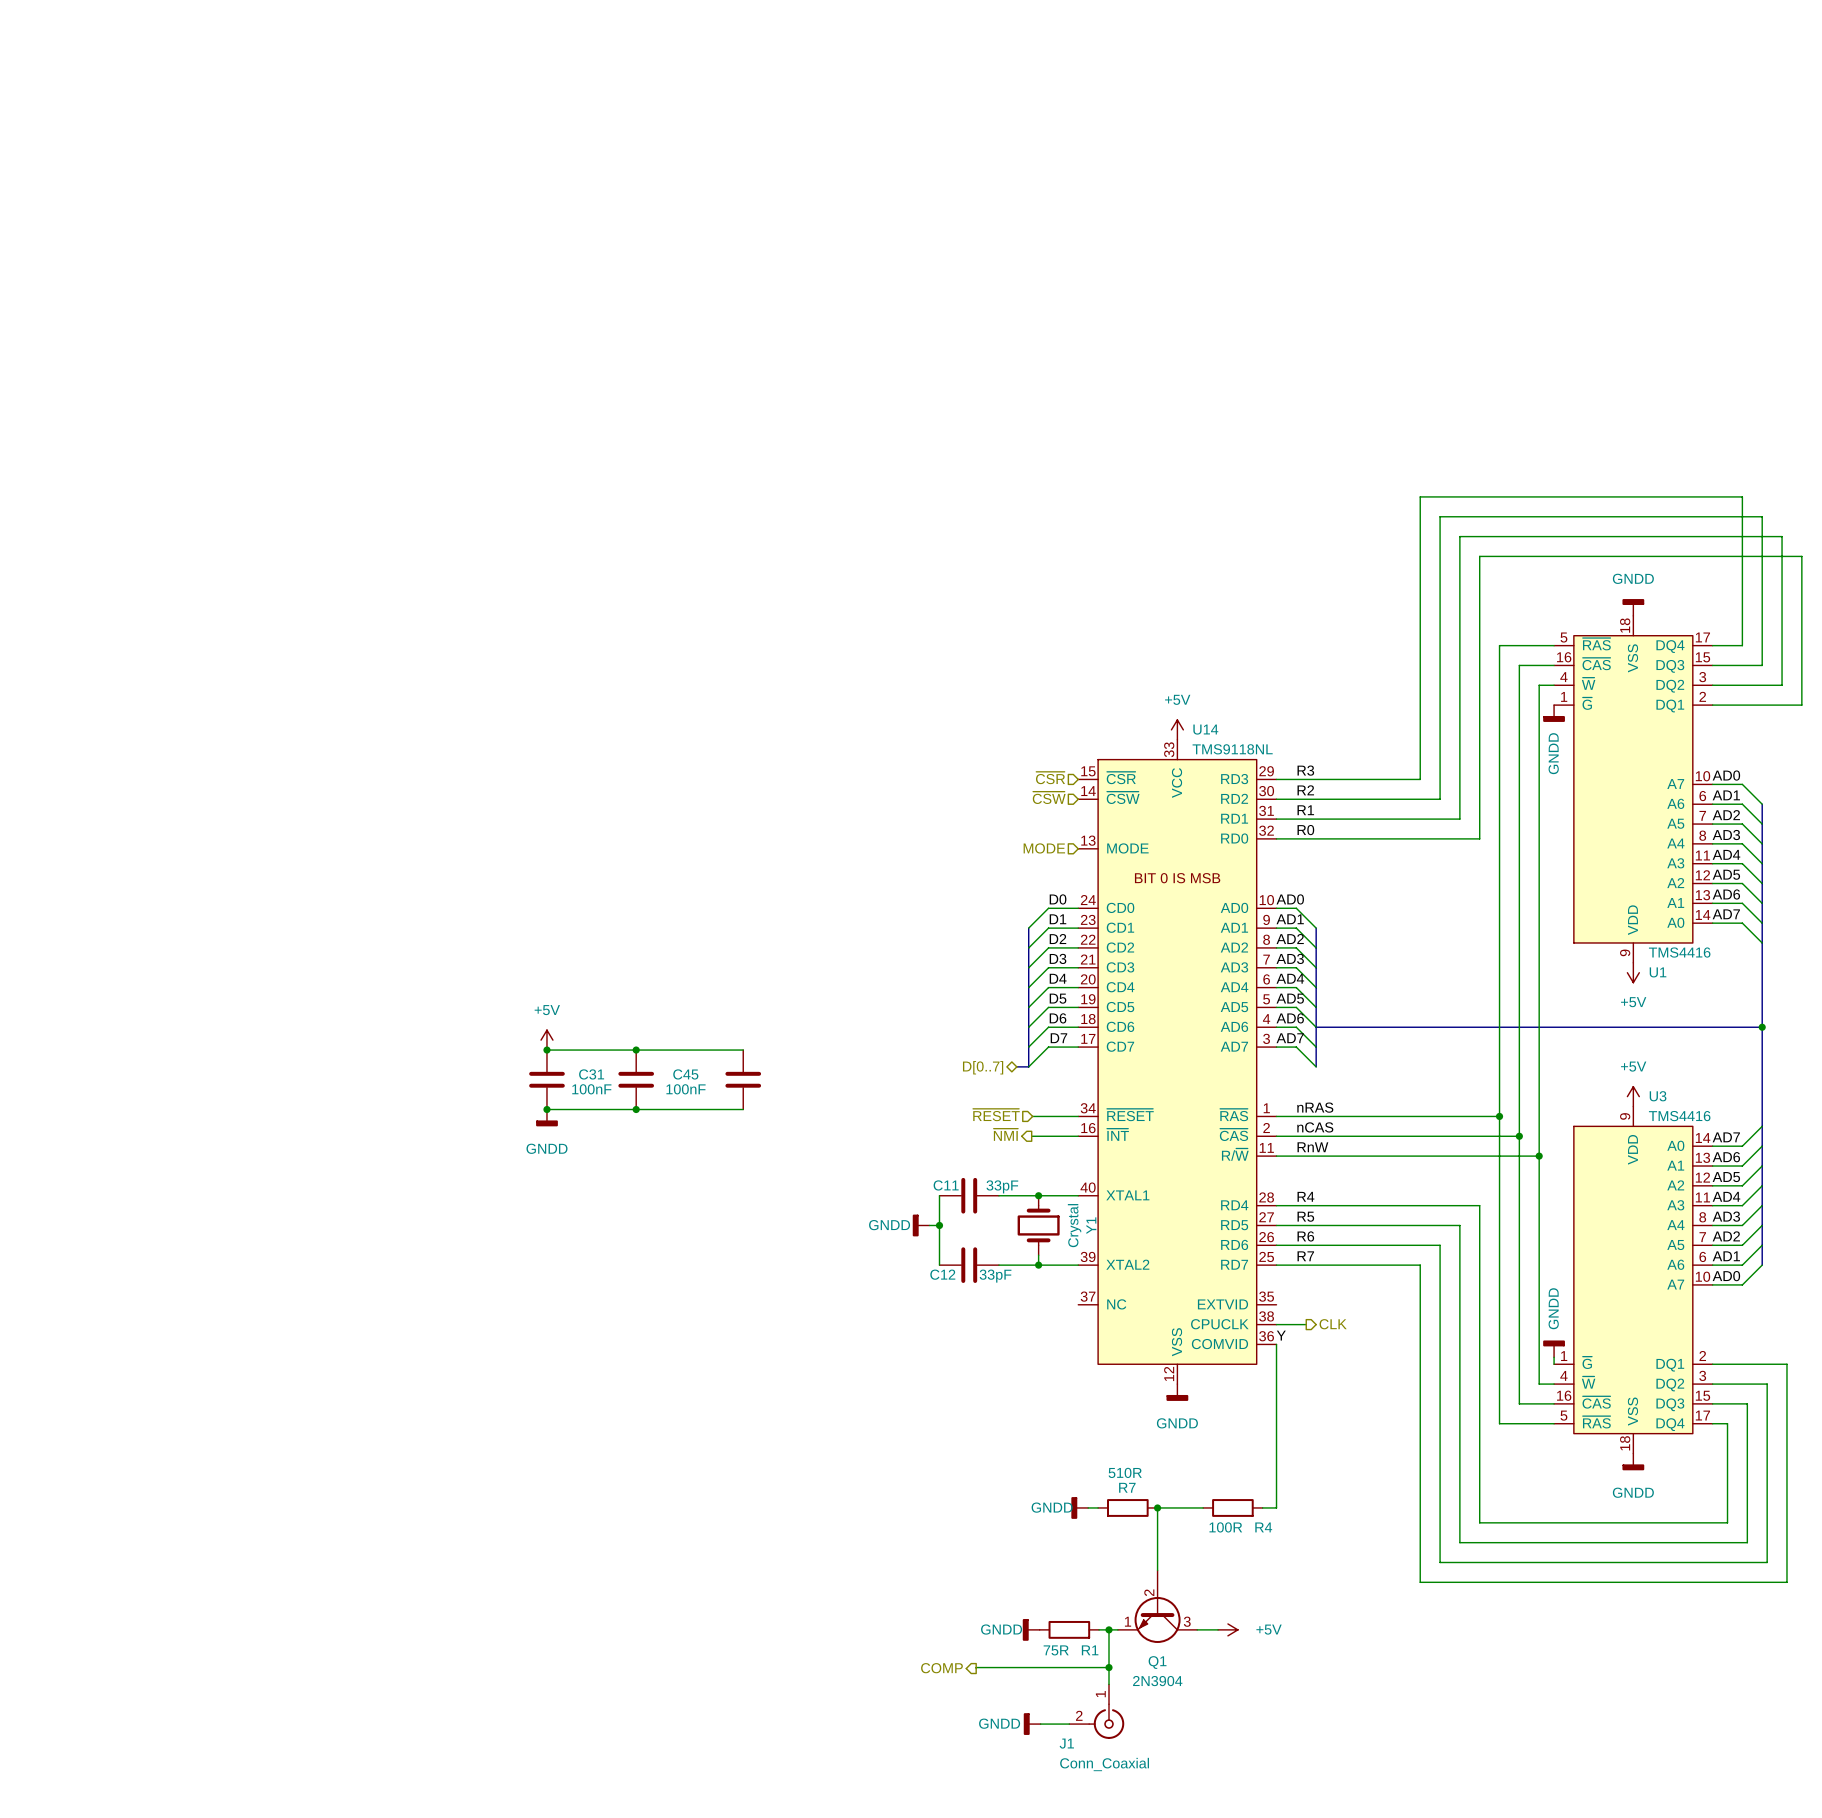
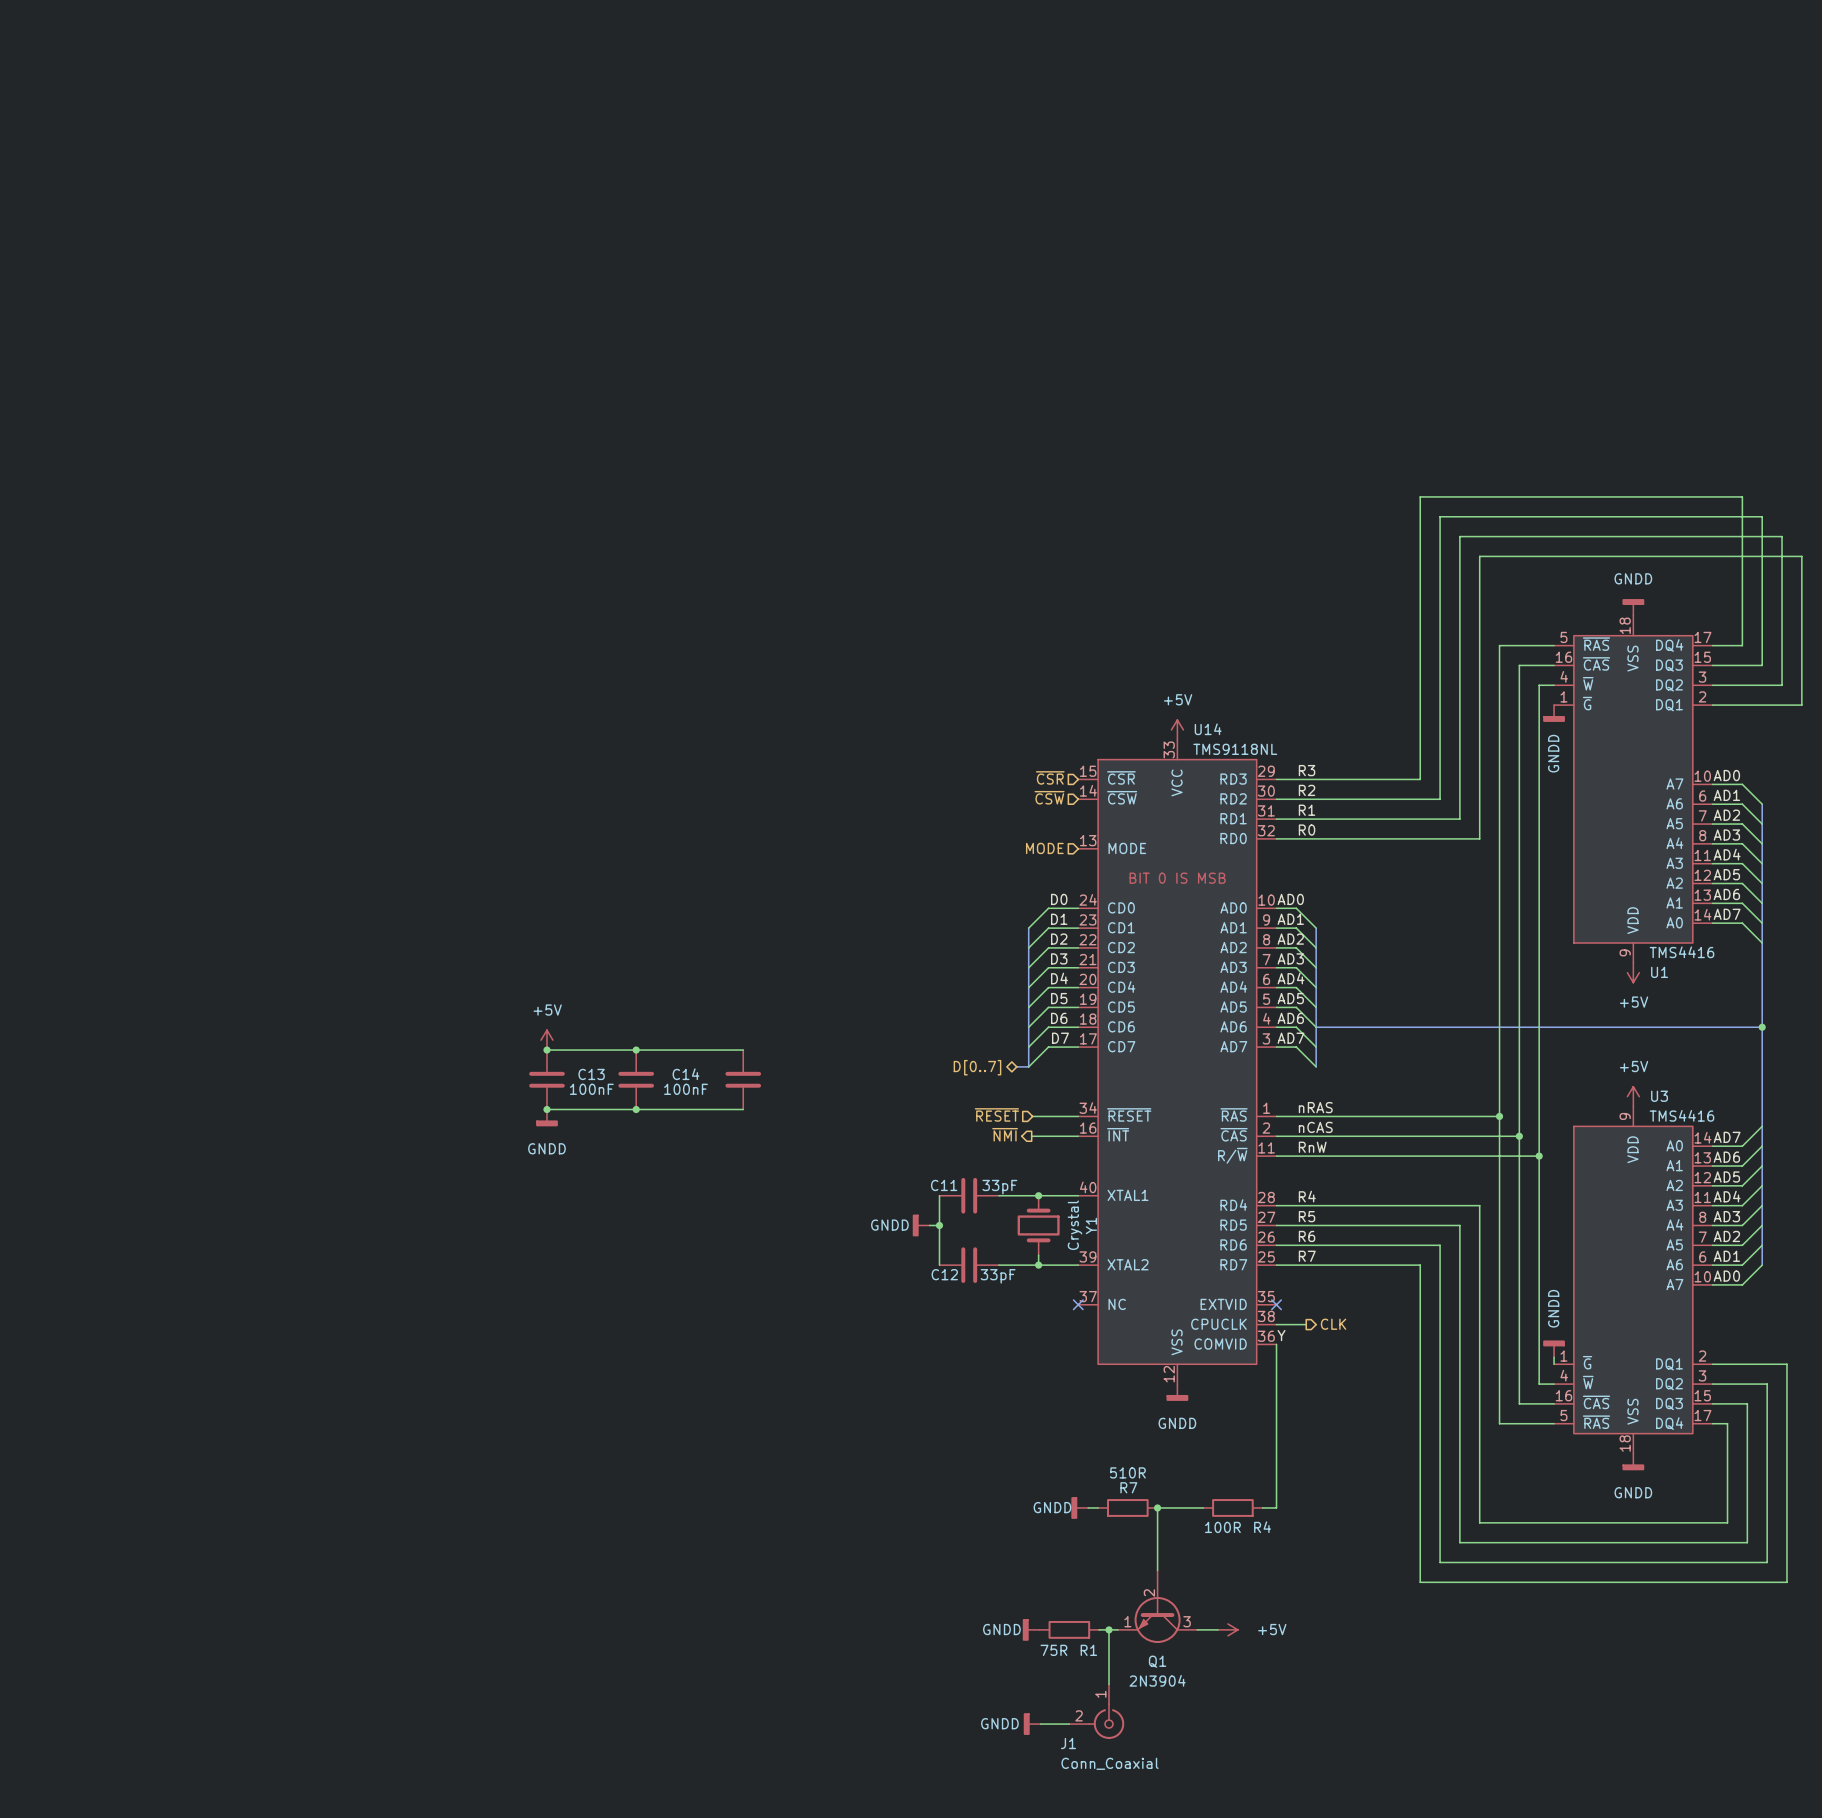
C31 name: C31 (591, 1074) -> C13 (591, 1074)
C45 name: C45 (685, 1074) -> C14 (685, 1074)
no-connect mark: none -> (1078, 1304)
no-connect mark: none -> (1276, 1304)
wire: (1109, 1667) (976, 1668) -> none
junction: (1109, 1667) -> none
hierarchical label: COMP (941, 1668) -> none

